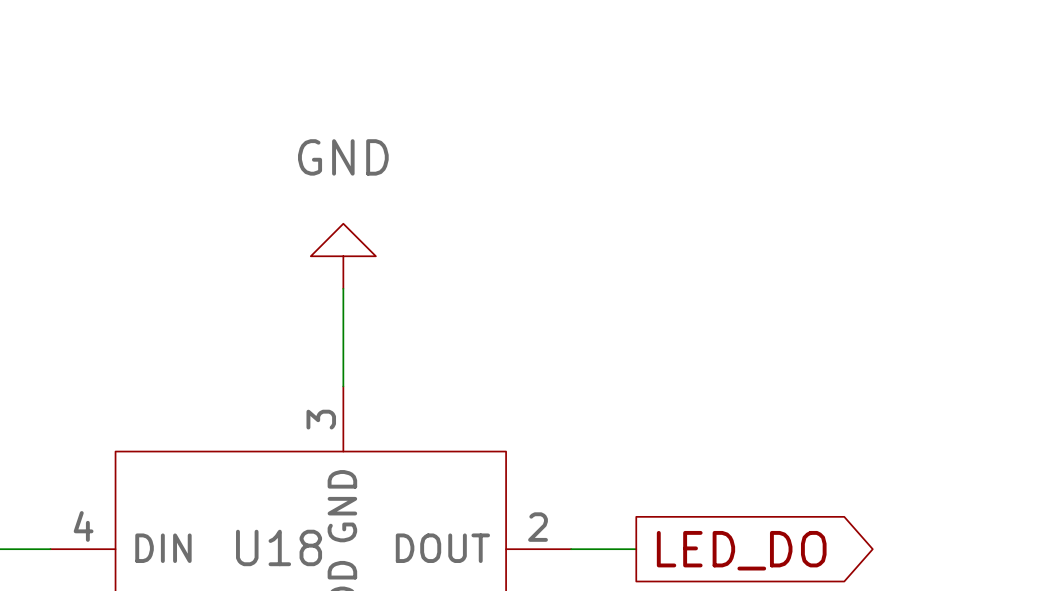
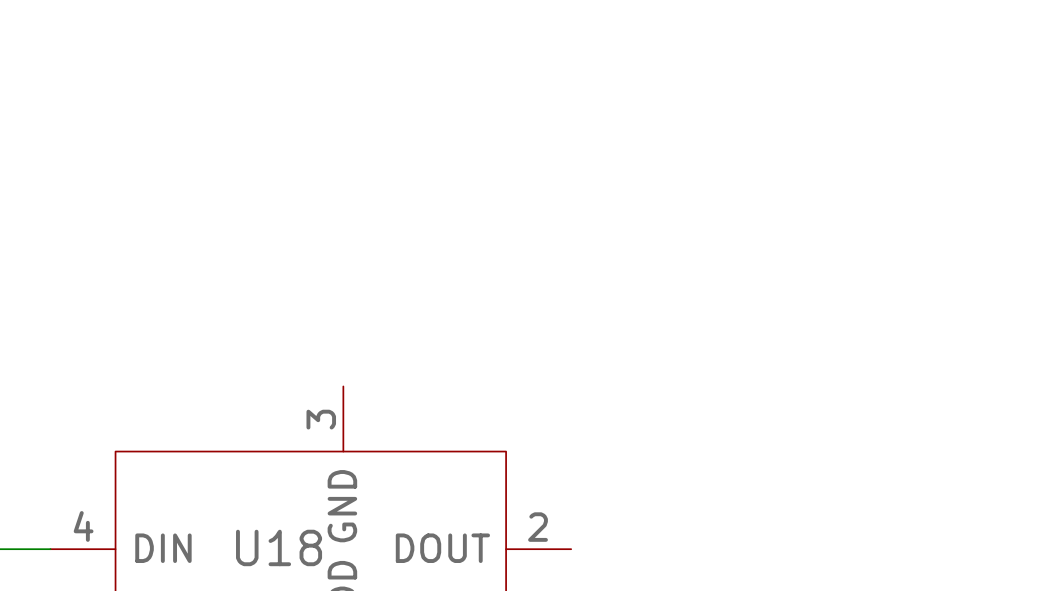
power symbol: GND (343, 256) -> none
wire: (343, 288) (343, 386) -> none
wire: (571, 549) (636, 549) -> none
global label: LED_DO (741, 550) -> none

